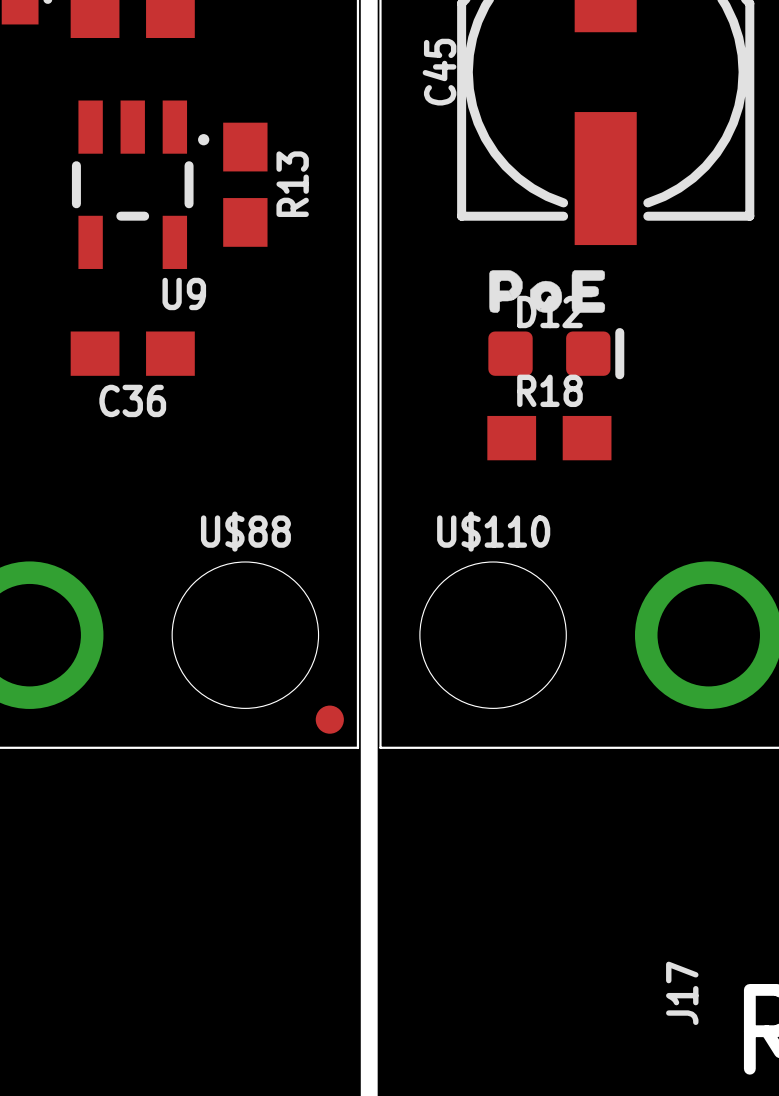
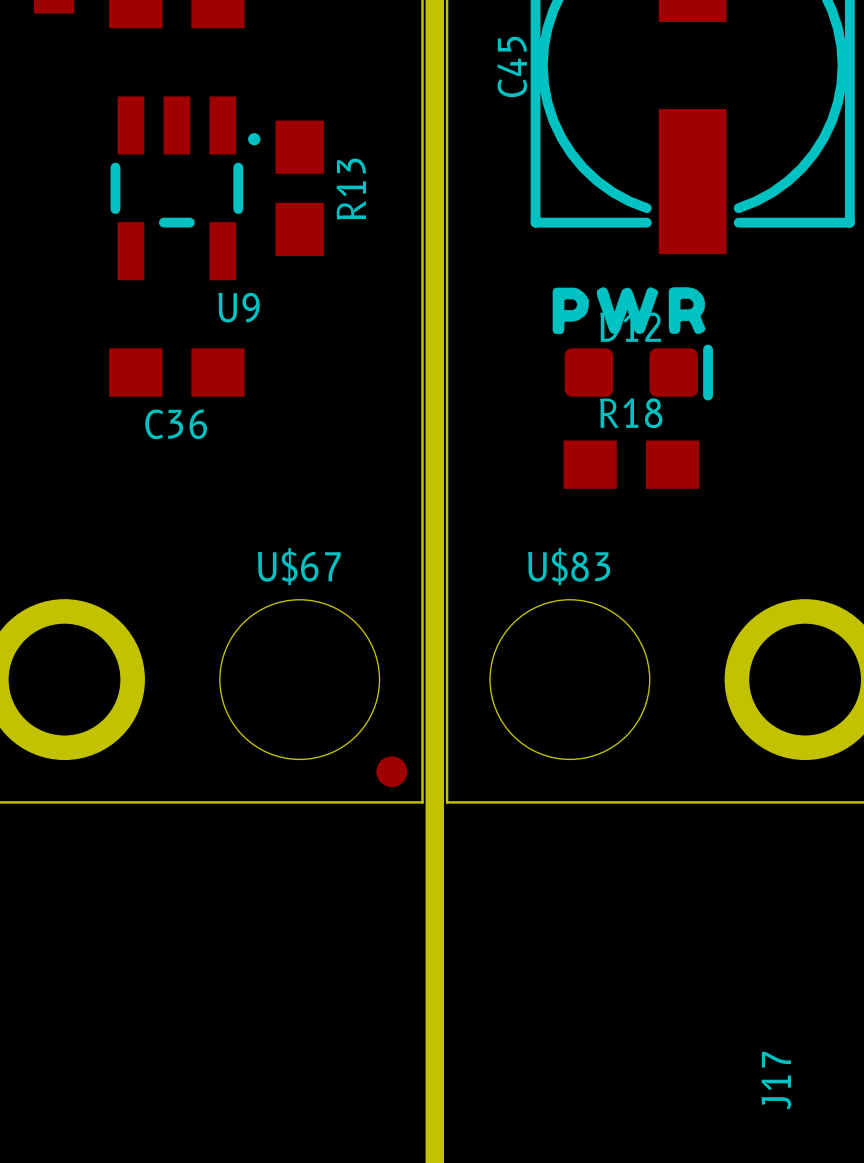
drawing shape: [489, 270, 606, 313] -> [552, 287, 706, 335]
U$88 name: U$88 (245, 531) -> U$67 (299, 566)
U$110 name: U$110 (493, 531) -> U$83 (569, 566)

